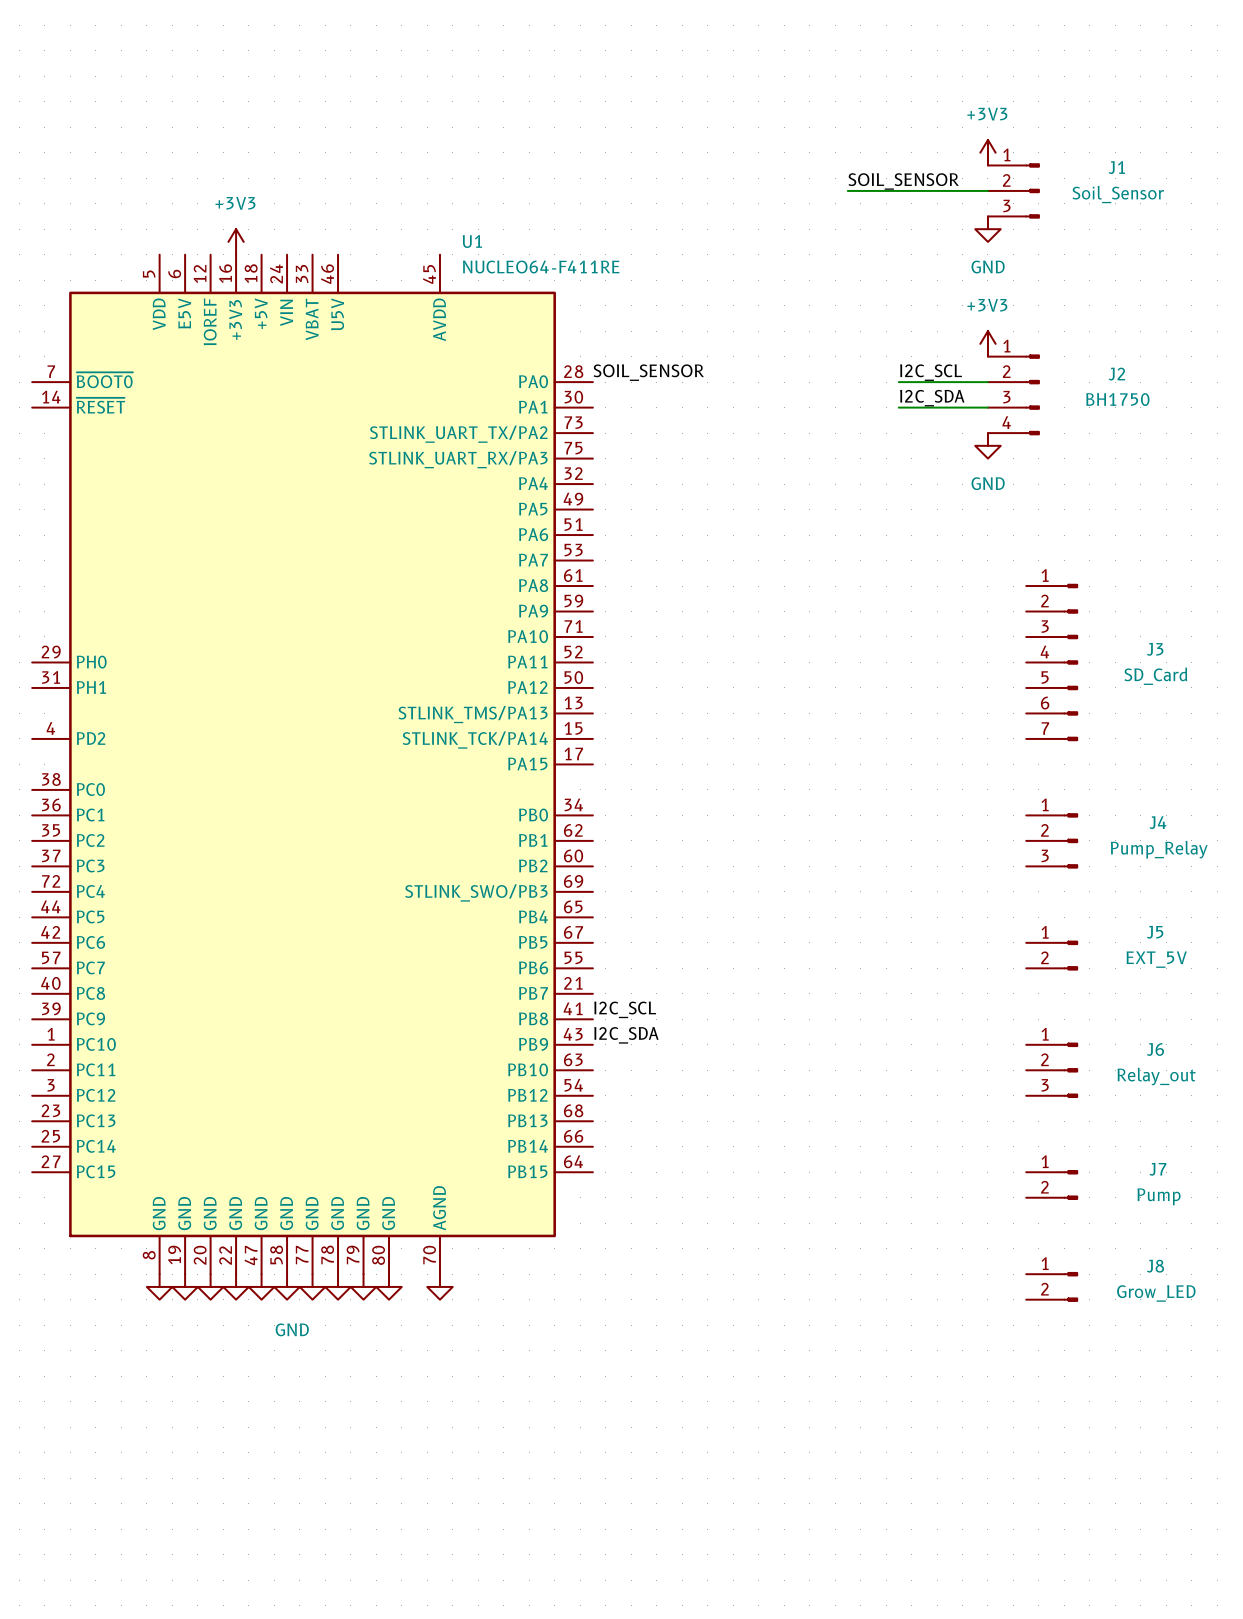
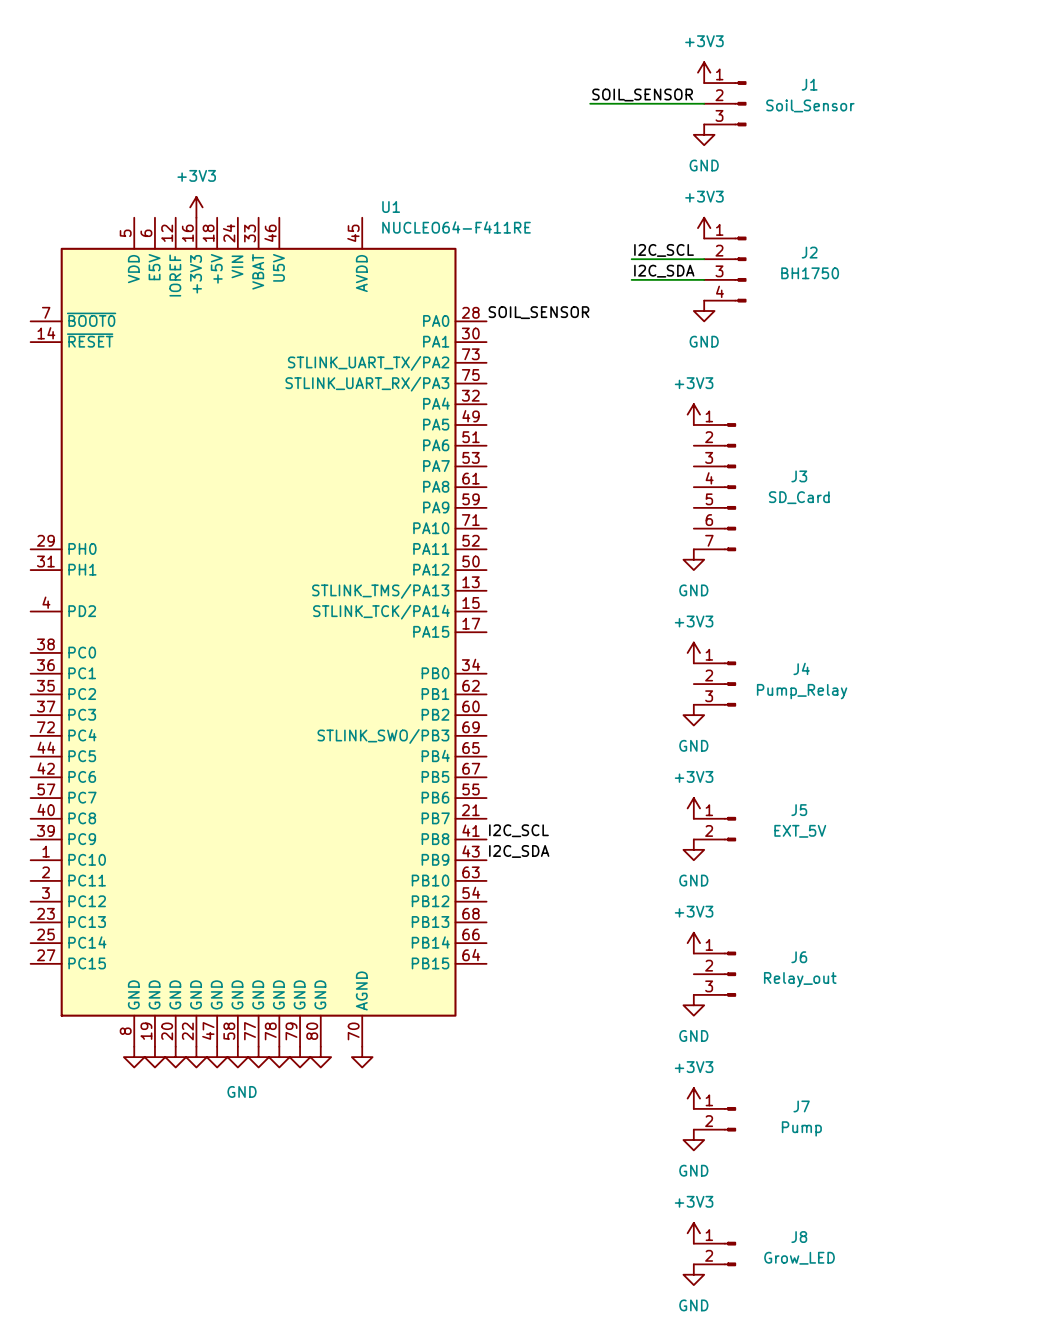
power symbol: none -> +3V3 (704, 72)
power symbol: none -> GND (704, 134)
power symbol: +3V3 (987, 152) -> none
label position: SOIL_SENSOR (903, 181) -> SOIL_SENSOR (642, 95)
wire: (847, 190) (987, 190) -> (590, 103) (704, 103)
J1 position: (1013, 190) -> (725, 103)
power symbol: GND (987, 229) -> none
power symbol: none -> +3V3 (704, 228)
power symbol: +3V3 (987, 343) -> none
power symbol: none -> GND (704, 311)
label position: I2C_SCL (931, 372) -> I2C_SCL (664, 250)
wire: (898, 382) (987, 382) -> (631, 259) (704, 259)
J2 position: (1013, 394) -> (725, 269)
label position: I2C_SDA (932, 398) -> I2C_SDA (664, 271)
wire: (898, 407) (987, 407) -> (631, 279) (704, 279)
power symbol: GND (987, 445) -> none
power symbol: none -> +3V3 (693, 414)
J3 position: (1052, 662) -> (714, 487)
power symbol: none -> GND (693, 559)
power symbol: none -> +3V3 (693, 652)
J4 position: (1052, 840) -> (714, 684)
power symbol: none -> GND (693, 715)
J5 position: (1052, 955) -> (714, 829)
power symbol: none -> +3V3 (693, 808)
power symbol: none -> GND (693, 849)
J6 position: (1052, 1070) -> (714, 974)
power symbol: none -> +3V3 (693, 943)
J7 position: (1052, 1184) -> (714, 1119)
power symbol: none -> GND (693, 1005)
J8 position: (1052, 1286) -> (714, 1254)
power symbol: none -> +3V3 (693, 1098)
power symbol: none -> GND (693, 1140)
power symbol: none -> +3V3 (693, 1233)
power symbol: none -> GND (693, 1274)

